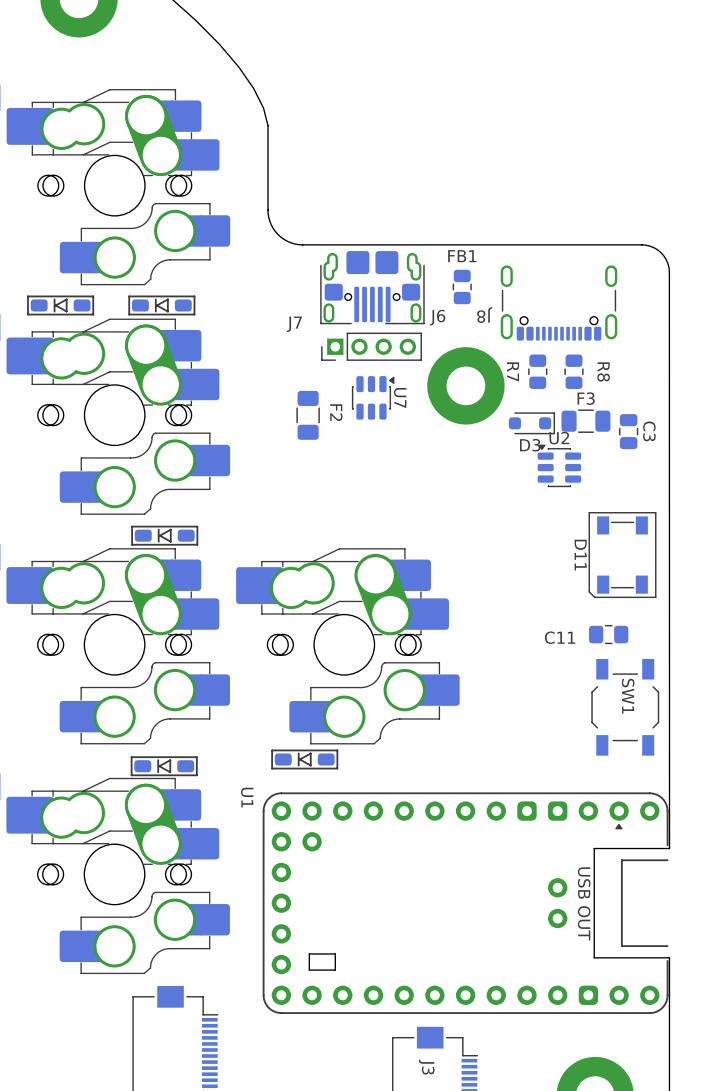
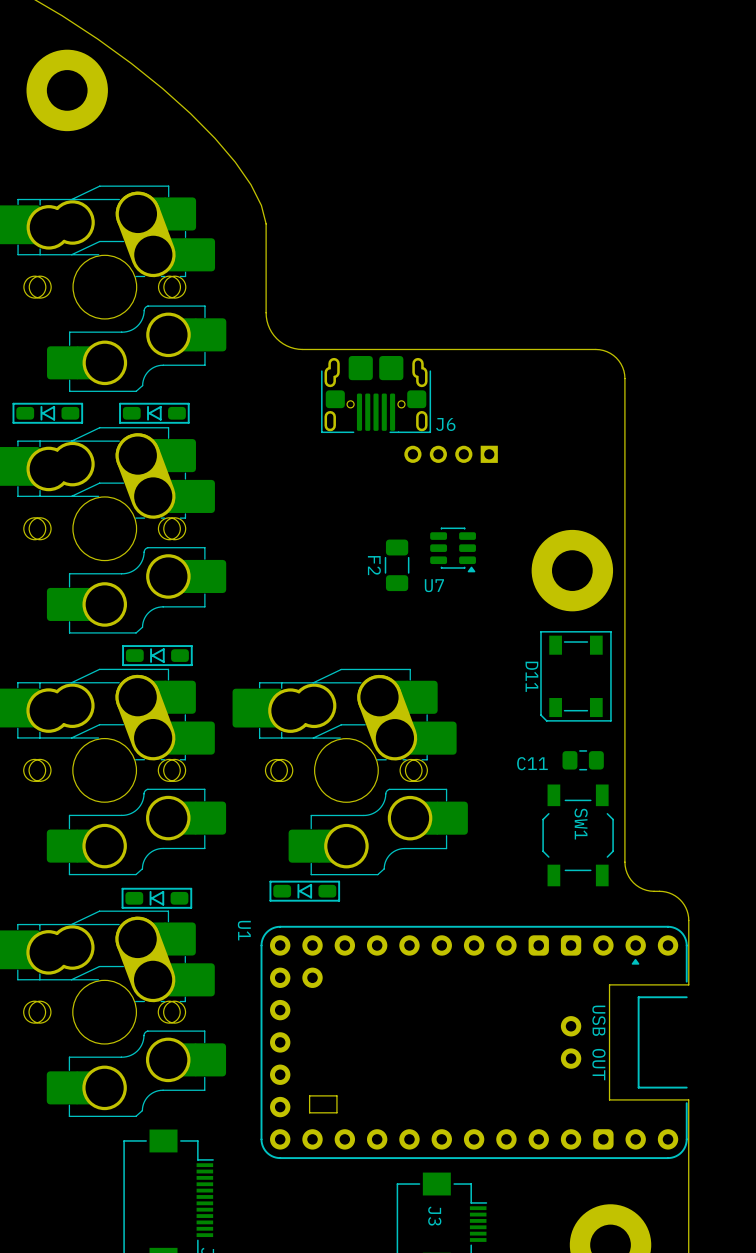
board edge: (581, 244) (648, 245) (661, 252) (669, 268) (669, 848) -> (595, 349) (606, 351) (616, 357) (622, 367) (624, 378) (625, 865) (628, 876) (636, 885) (646, 890) (672, 894) (680, 899) (685, 907) (688, 920) (688, 984)
FB1: (462, 287) -> none
J8: (558, 302) -> none
J7 side: bottom (371, 346) -> top (451, 454)
R7: (537, 371) -> none
R8: (573, 371) -> none
part position: (465, 385) -> (572, 570)
U7 rotation: 0° (373, 397) -> 90° clockwise (453, 549)
U7 position: (373, 397) -> (453, 549)
F2 name position: F2 (336, 412) -> F2 (374, 565)
F2 position: (308, 415) -> (397, 565)
F3: (585, 421) -> none
D3: (531, 423) -> none
C3: (628, 431) -> none
U2: (559, 465) -> none
D11 position: (622, 555) -> (575, 676)
C11 position: (608, 634) -> (583, 760)
SW1 position: (625, 707) -> (578, 835)

